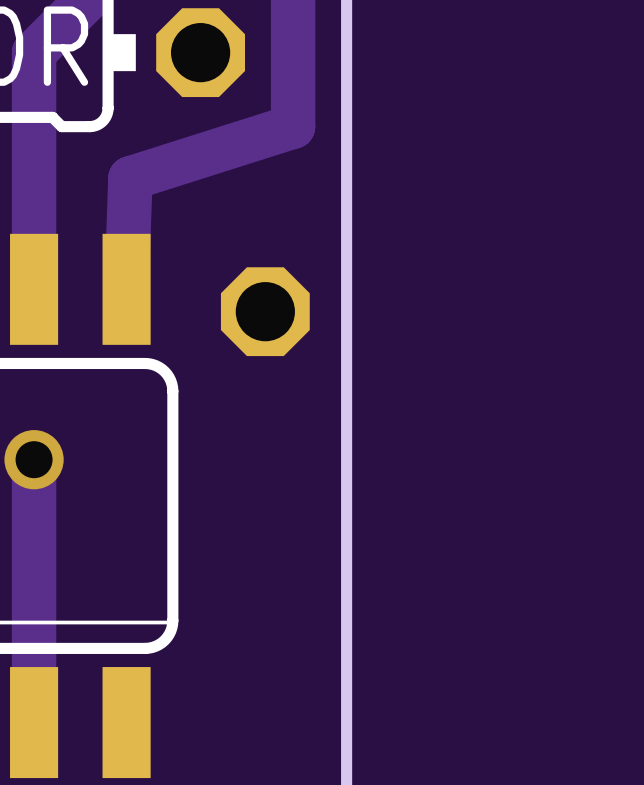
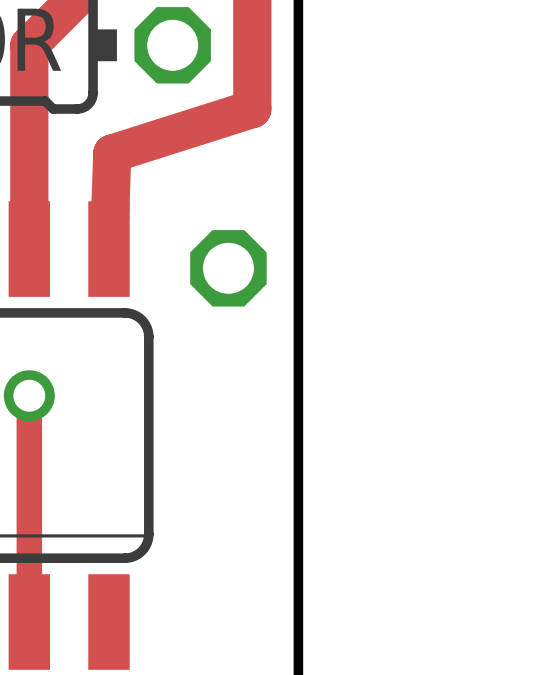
track width: thick (34, 459) (34, 722) -> thin (29, 395) (29, 622)

